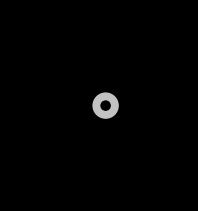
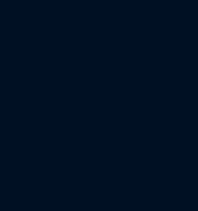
via: (105, 105) -> none

